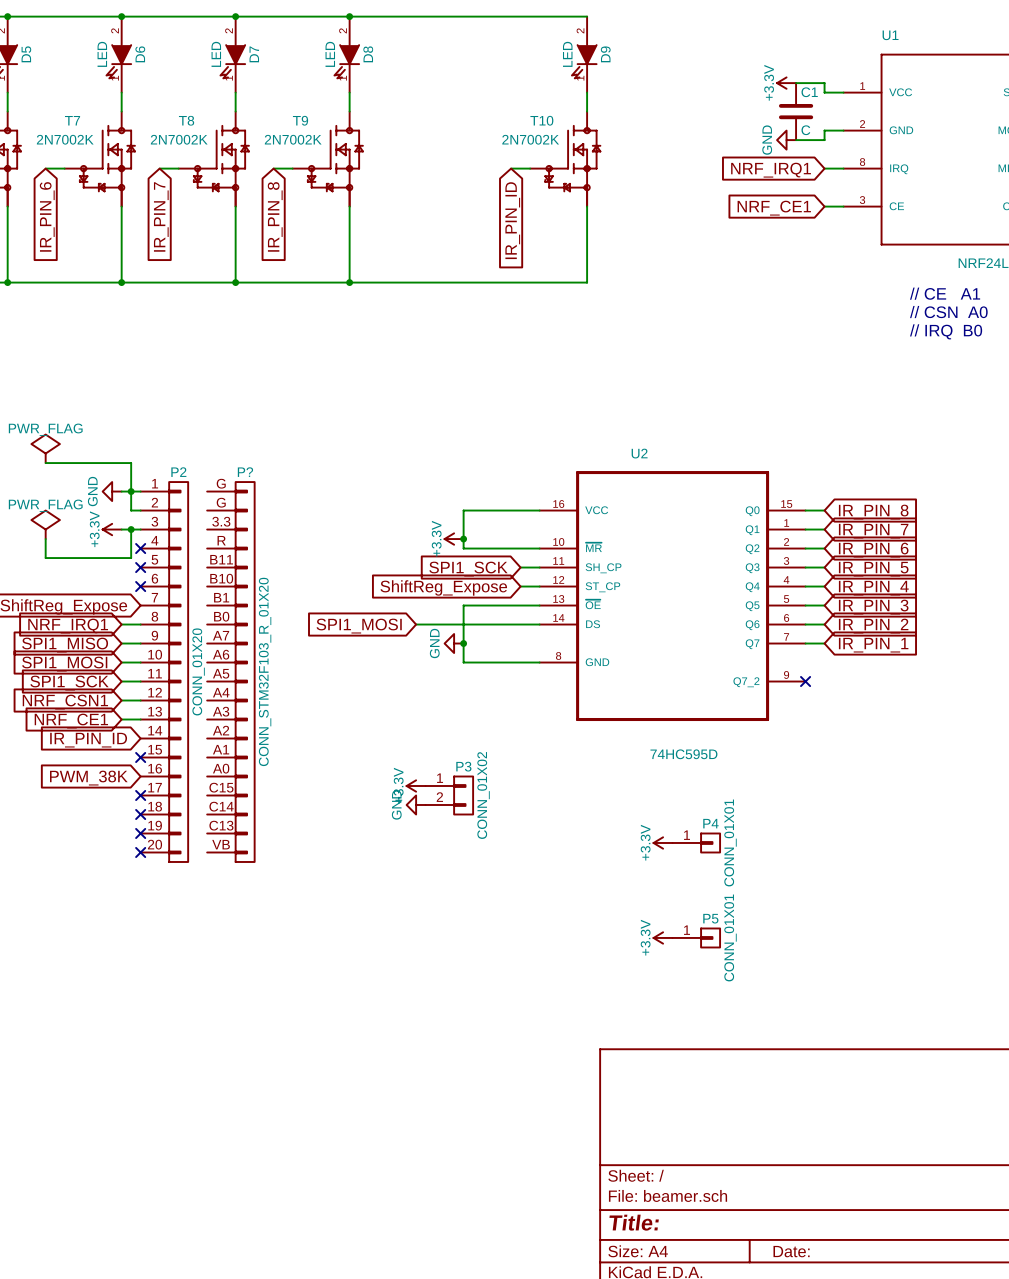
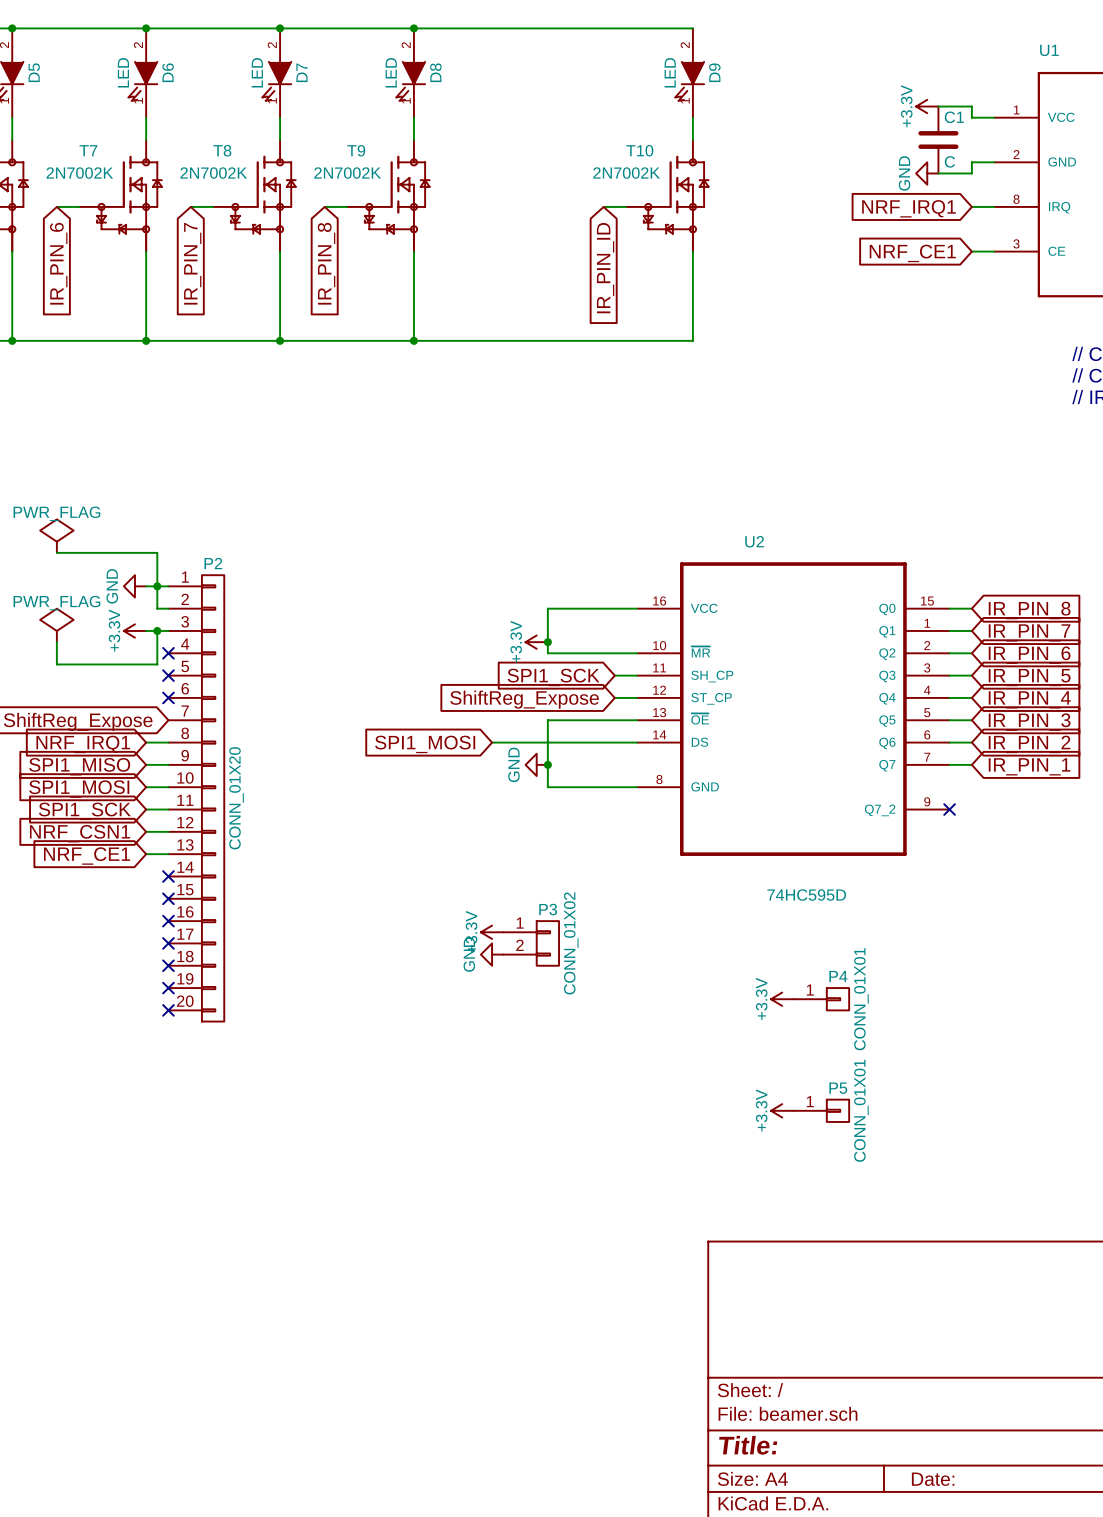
P?: CONN_STM32F103_R_01X20 (230, 672) -> none
no-connect mark: none -> (168, 876)
global label: IR_PIN_ID (88, 740) -> none
no-connect mark: none -> (168, 921)
global label: PWM_38K (88, 778) -> none

